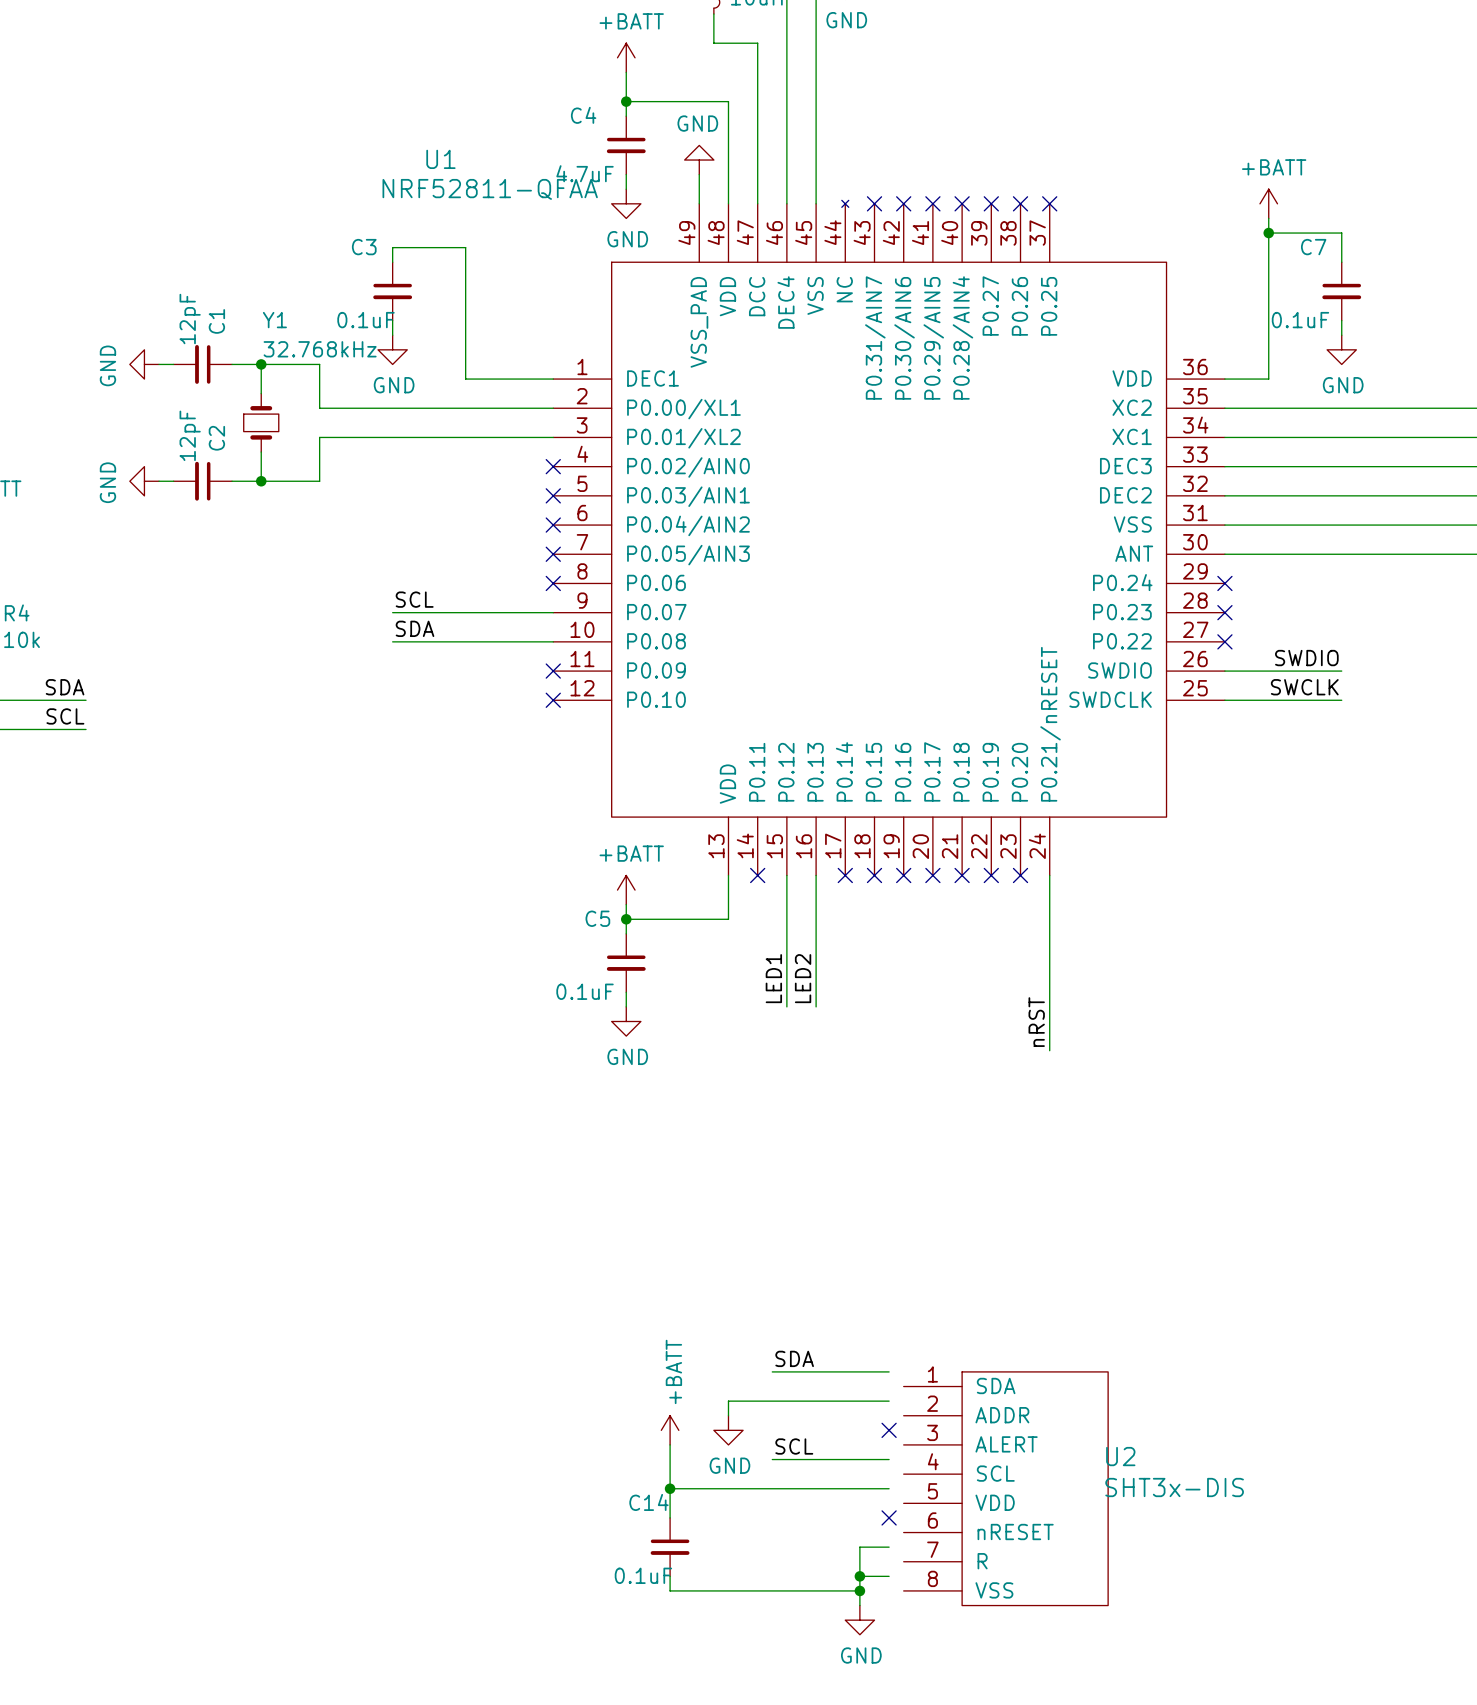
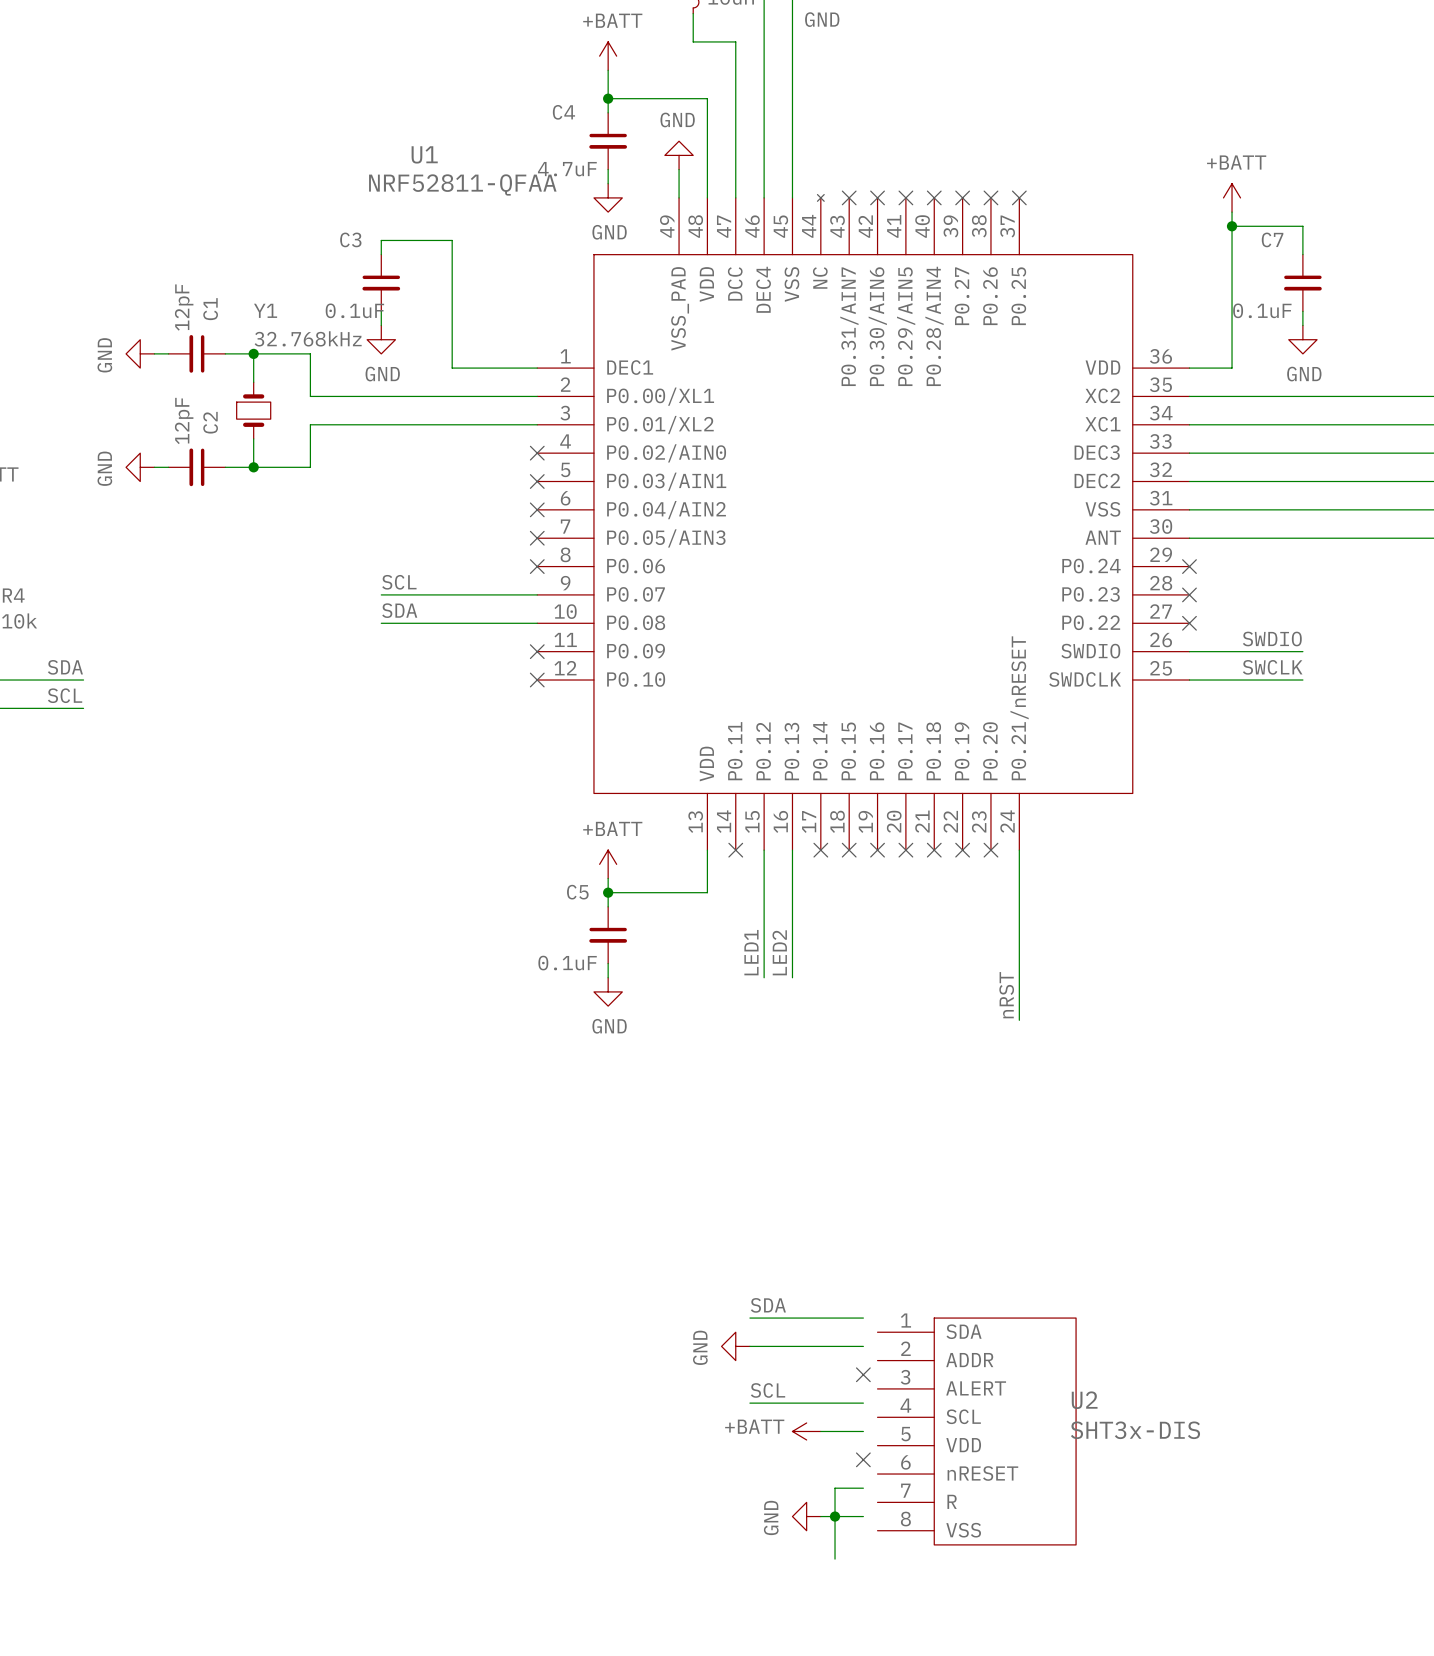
label position: SDA (794, 1358) -> SDA (768, 1305)
wire: (772, 1371) (889, 1371) -> (749, 1318) (863, 1318)
wire: none -> (749, 1346) (863, 1346)
wire: (889, 1401) (728, 1401) (728, 1415) -> none
power symbol rotation: 0° (670, 1430) -> 90° counterclockwise (806, 1431)
power symbol position: +BATT (670, 1430) -> +BATT (806, 1431)
power symbol rotation: 0° (728, 1430) -> 90° clockwise (735, 1346)
power symbol position: GND (728, 1430) -> GND (735, 1346)
no-connect mark position: (889, 1430) -> (863, 1374)
wire: (670, 1444) (670, 1517) -> none
label position: SCL (794, 1446) -> SCL (768, 1390)
wire: (772, 1459) (889, 1459) -> (749, 1403) (863, 1403)
wire: none -> (820, 1431) (863, 1431)
wire: (670, 1488) (889, 1488) -> none
junction: (670, 1488) -> none
U2 position: (1005, 1488) -> (976, 1431)
no-connect mark position: (889, 1517) -> (863, 1459)
C14: 0.1uF (670, 1547) -> none
wire: (859, 1547) (889, 1547) -> (835, 1502) (835, 1488) (863, 1488)
wire: none -> (820, 1516) (863, 1516)
junction: none -> (835, 1516)
wire: (670, 1576) (670, 1590) (859, 1590) -> none
wire: (859, 1576) (889, 1576) -> none
junction: (859, 1576) -> none
junction: (859, 1590) -> none
power symbol rotation: 0° (859, 1620) -> 90° clockwise (806, 1516)
power symbol position: GND (859, 1620) -> GND (806, 1516)

